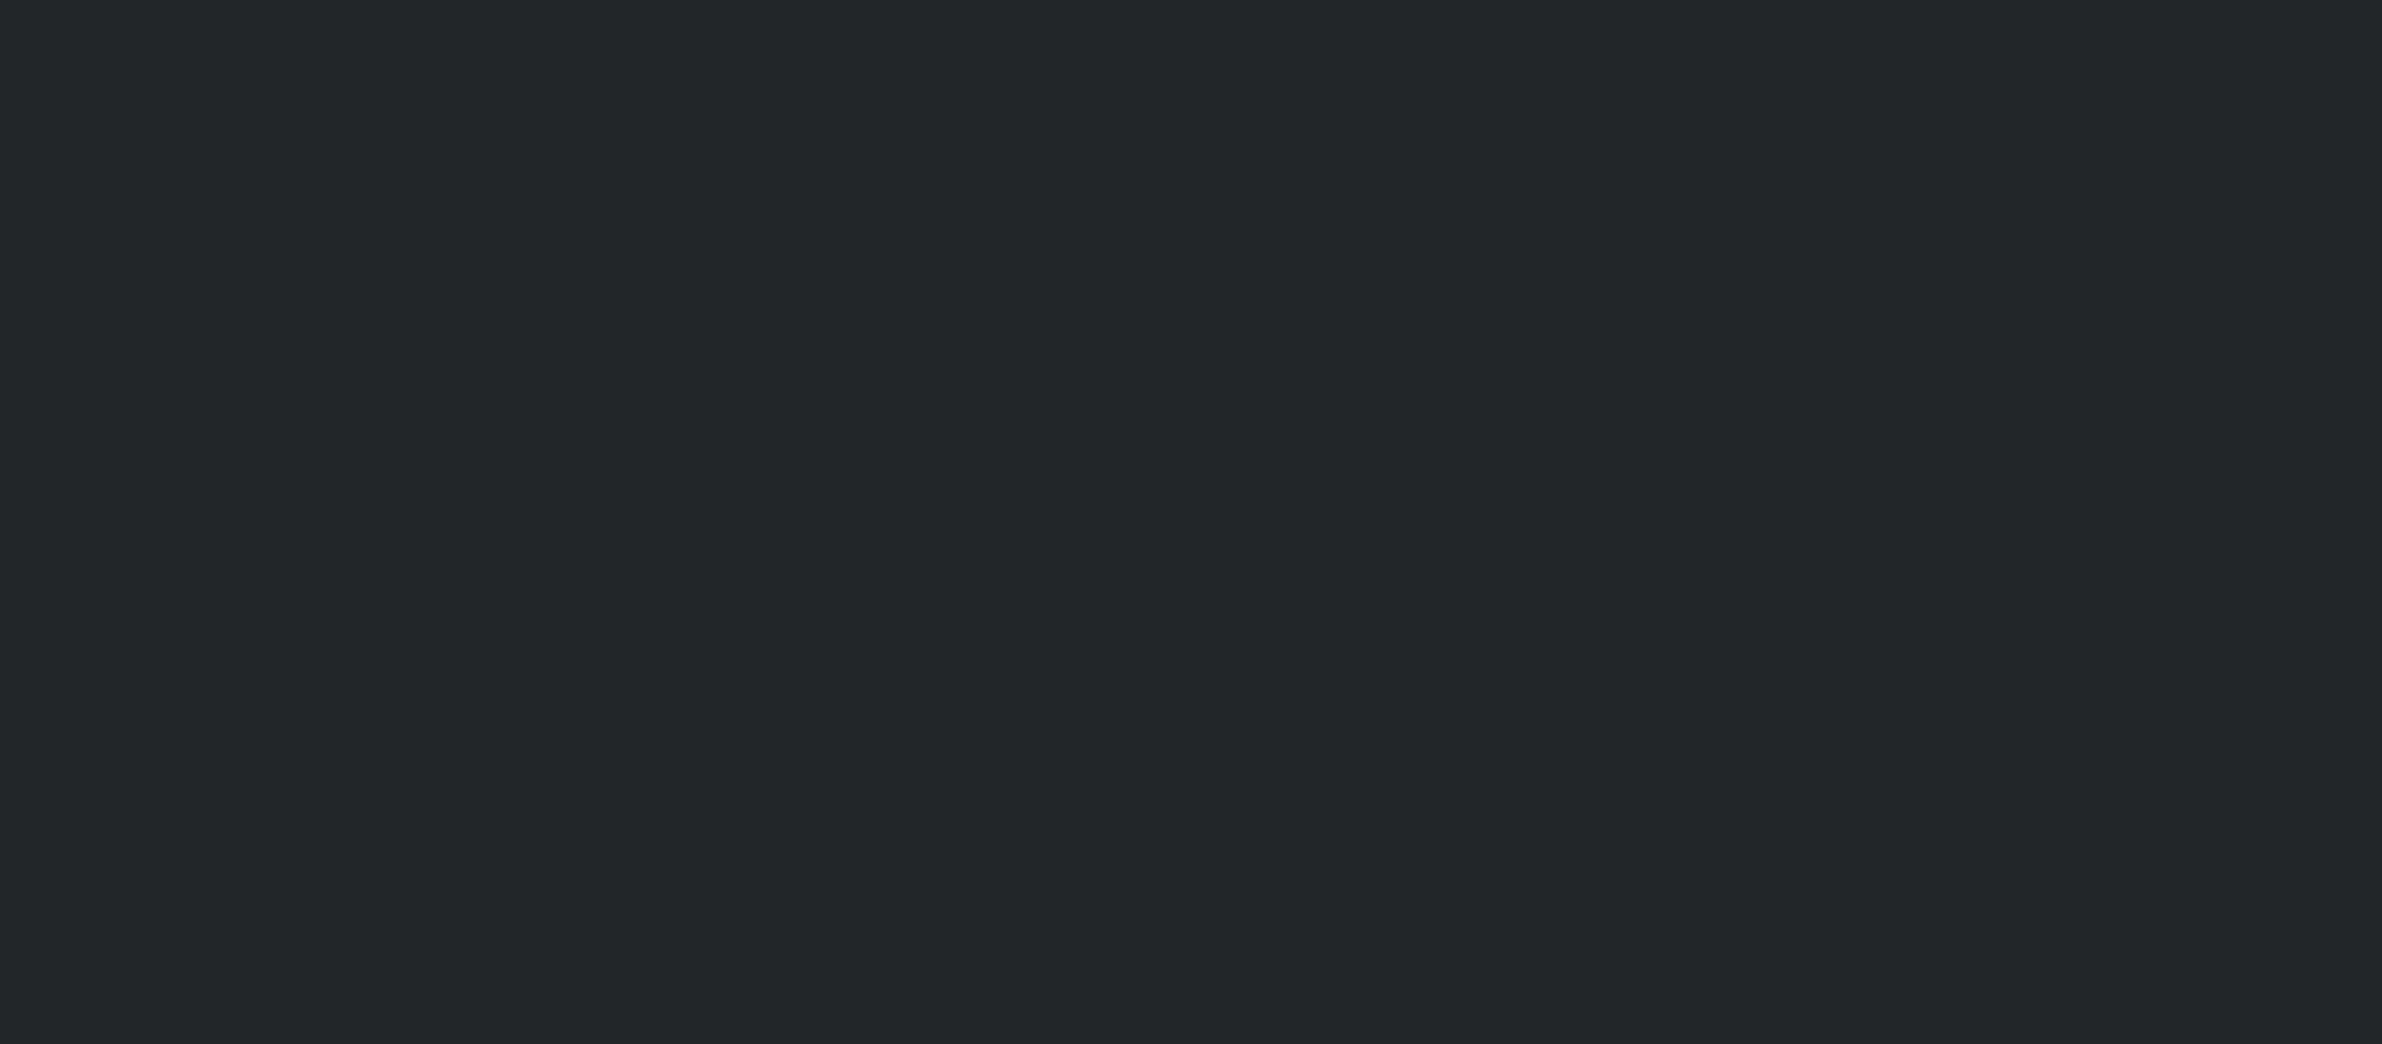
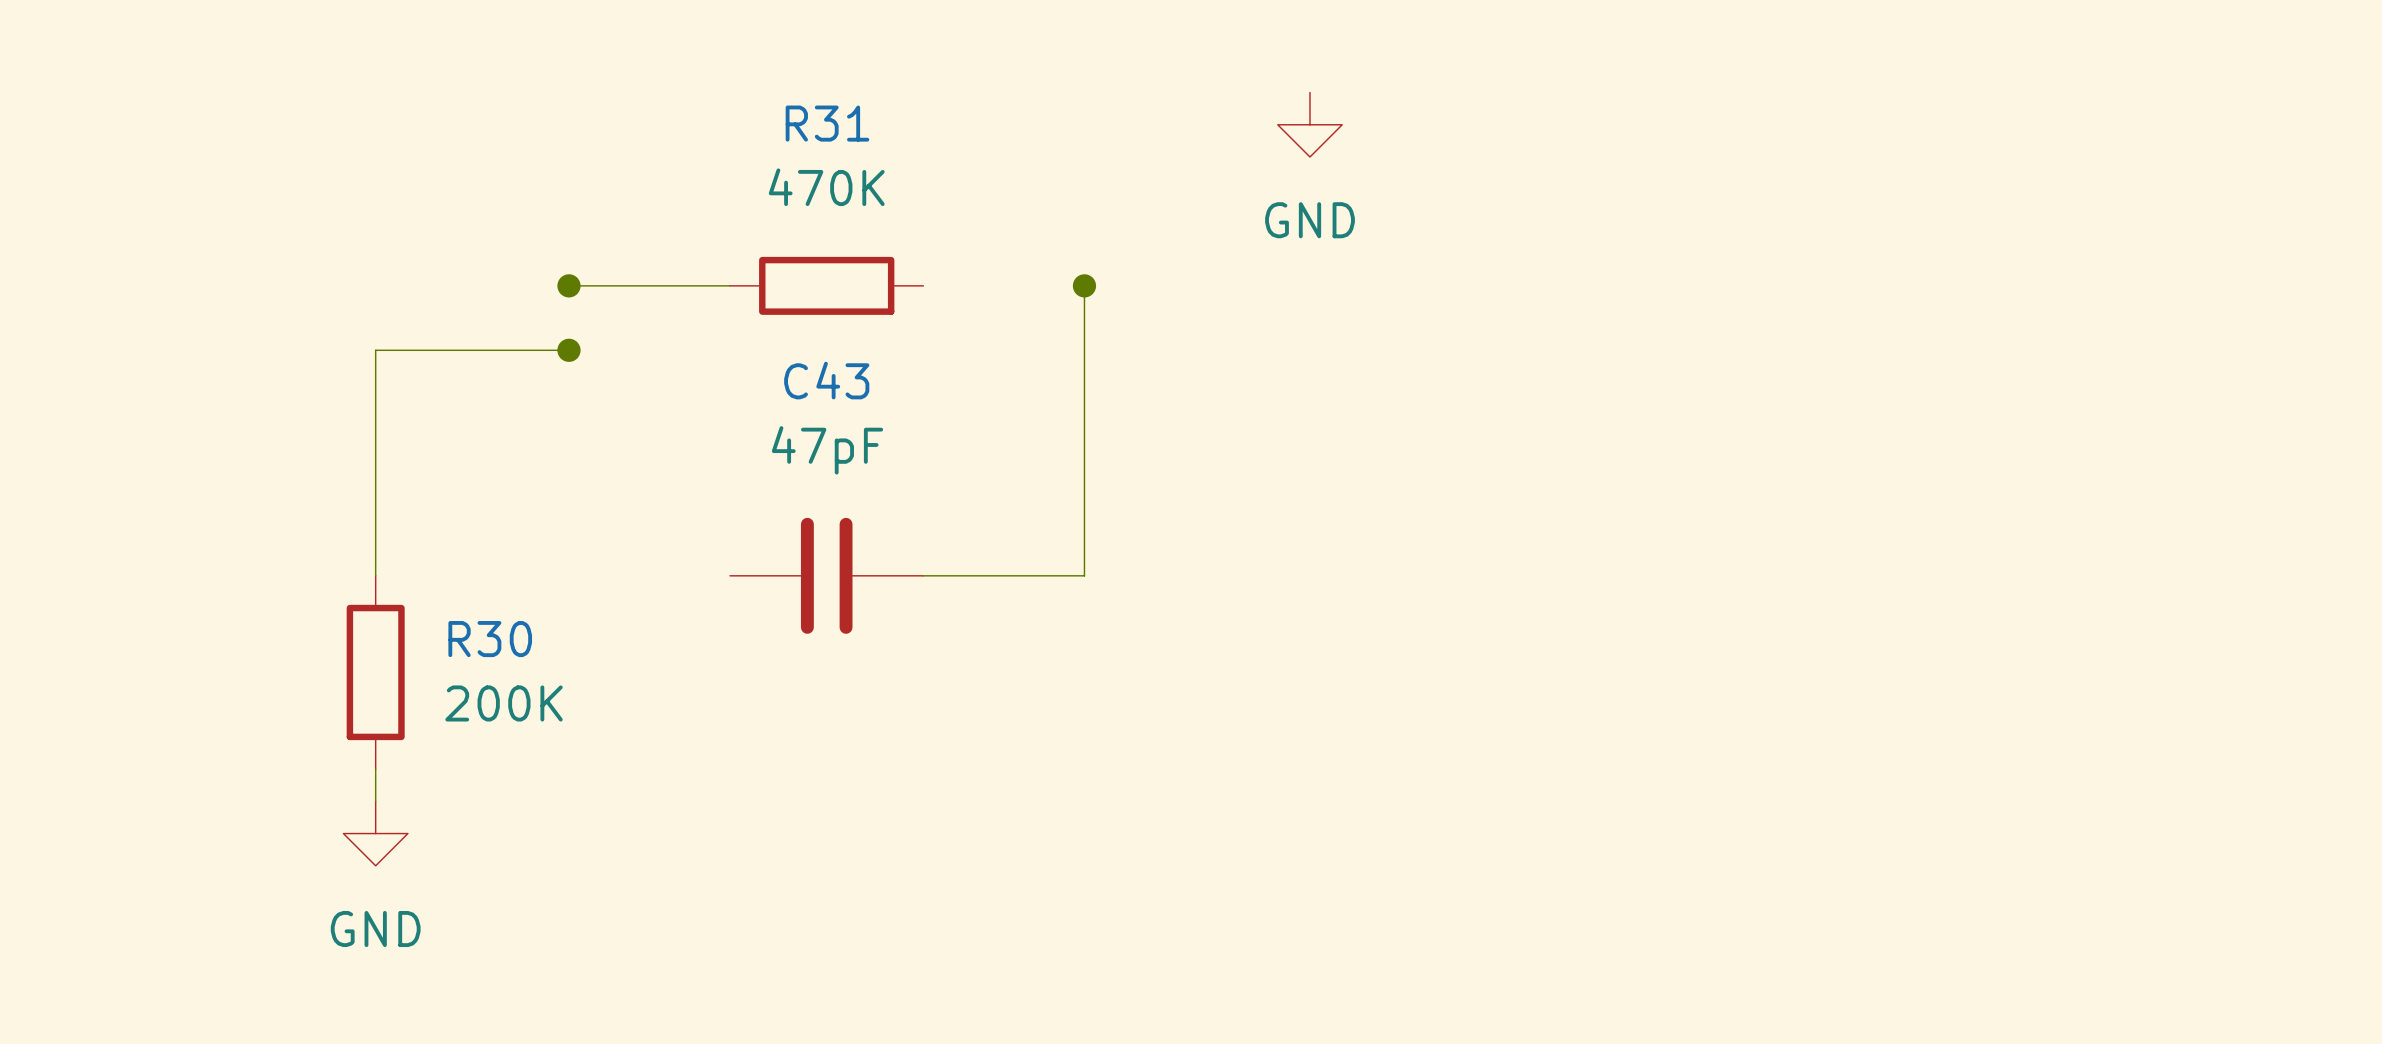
power symbol: none -> GND (1309, 124)
wire: none -> (568, 285) (730, 285)
junction: none -> (568, 285)
R31: none -> 470K (826, 285)
wire: none -> (1084, 285) (1084, 575) (923, 575)
junction: none -> (1084, 285)
wire: none -> (568, 350) (375, 350) (375, 575)
junction: none -> (568, 350)
C43: none -> 47pF (826, 575)
R30: none -> 200K (375, 672)
wire: none -> (375, 769) (375, 801)
power symbol: none -> GND (375, 833)

